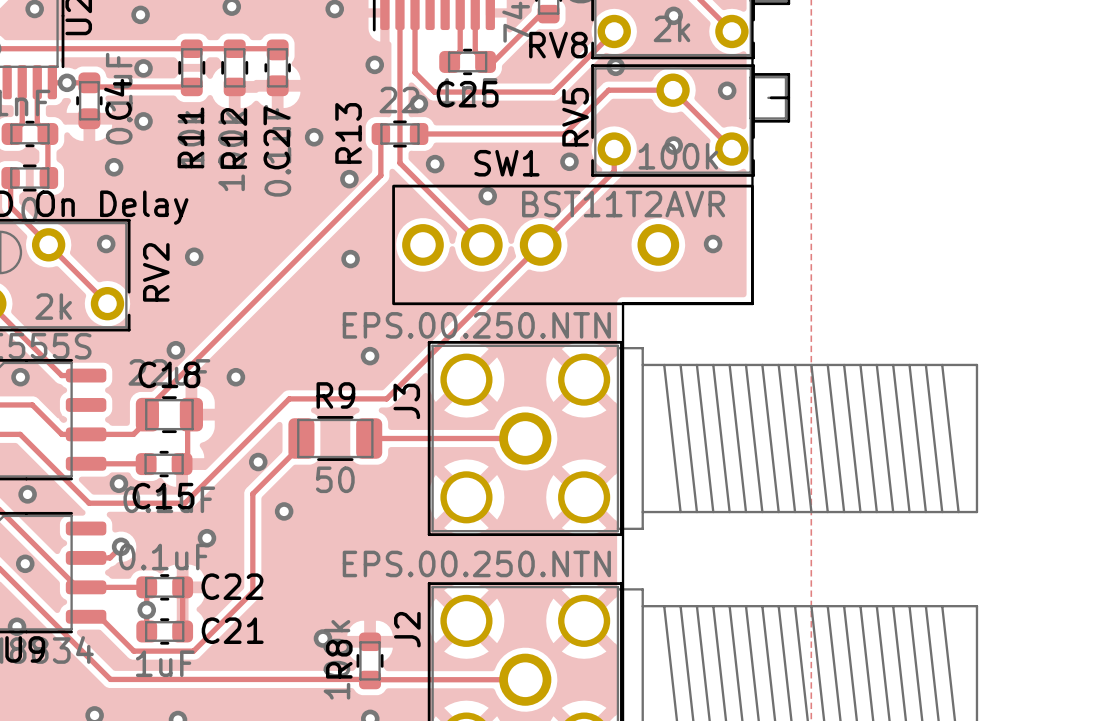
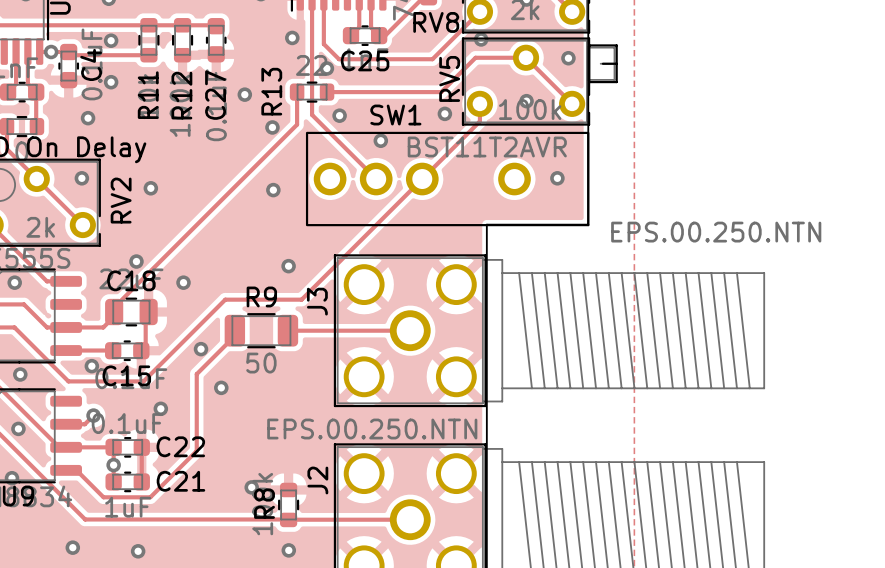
J3 value position: EPS.00.250.NTN (476, 325) -> EPS.00.250.NTN (716, 232)

